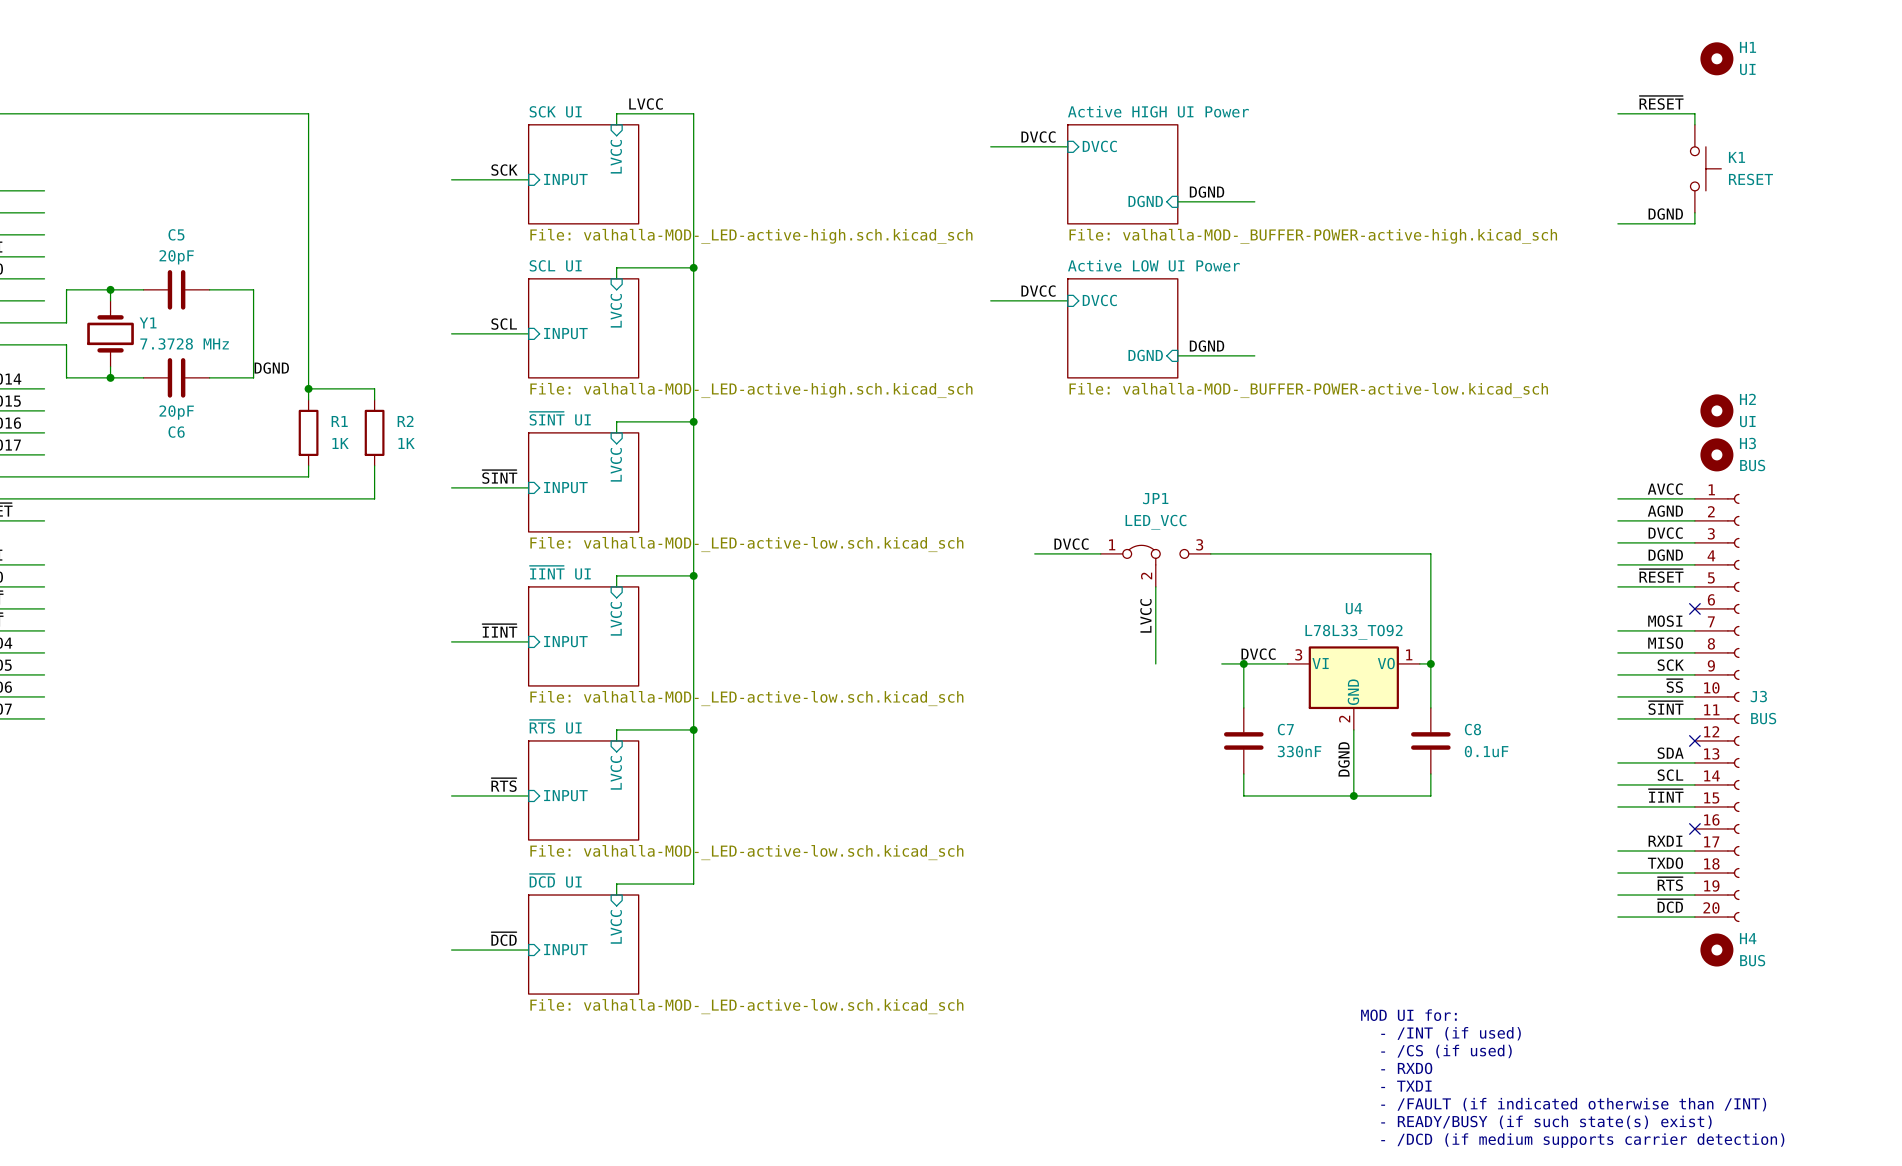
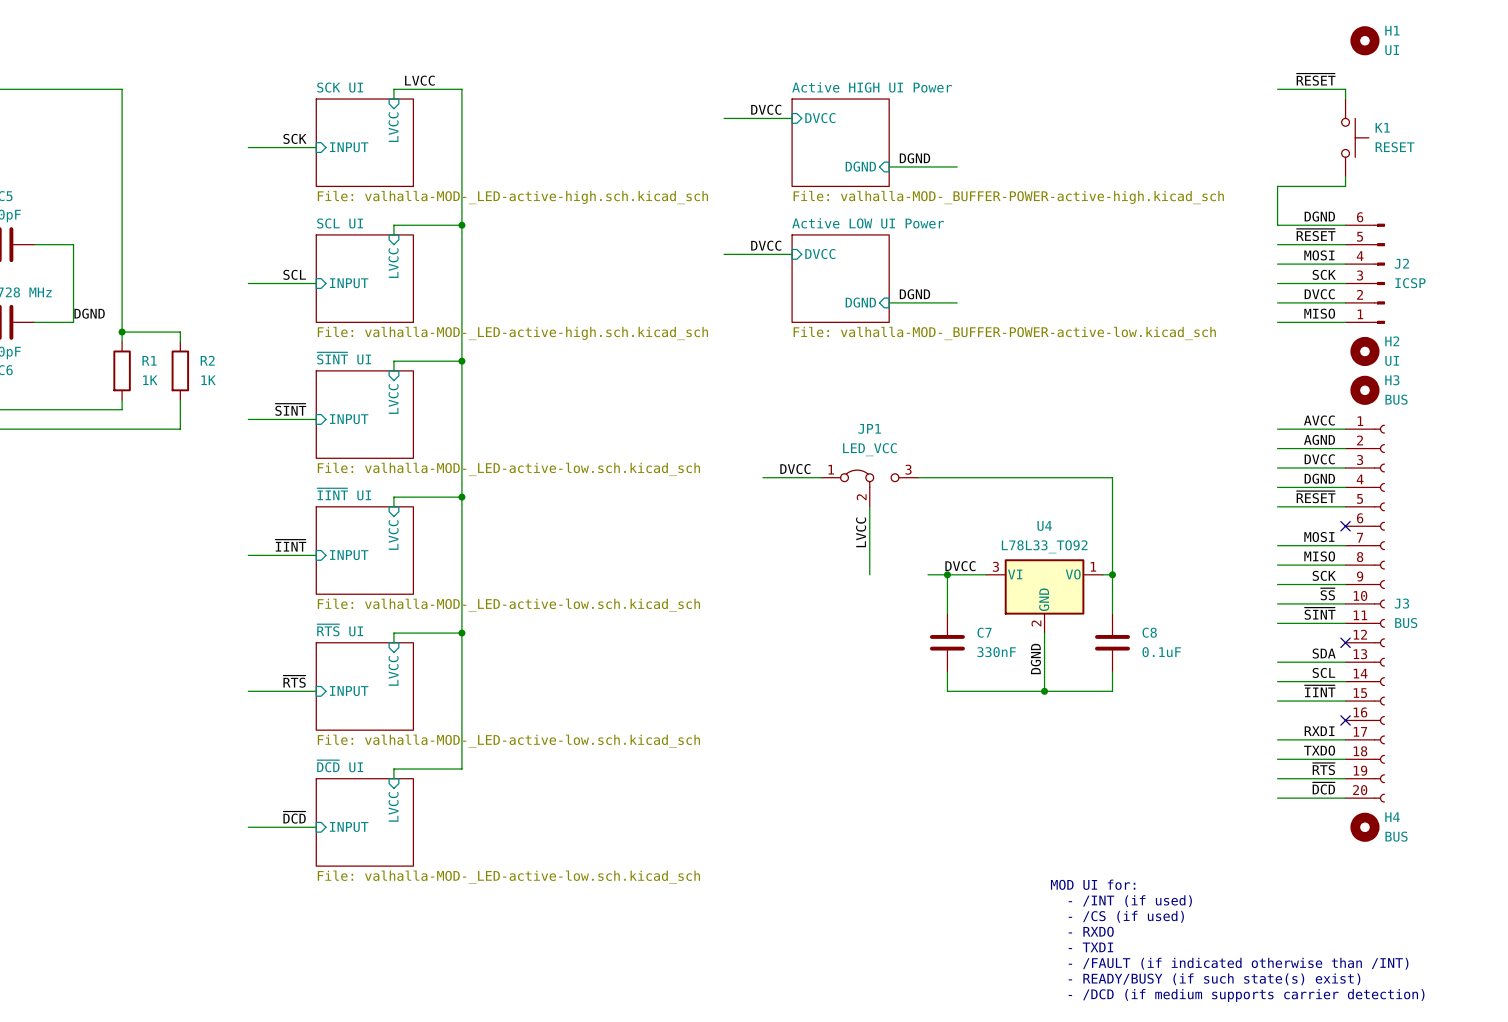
label position: DGND (1665, 214) -> DGND (1319, 216)
wire: none -> (1277, 186) (1277, 225) (1345, 225)
label: none -> ~{RESET} (1316, 234)
wire: none -> (1277, 244) (1345, 244)
label: none -> MOSI (1319, 255)
wire: none -> (1277, 264) (1345, 264)
J2: none -> ICSP (1365, 273)
label: none -> SCK (1324, 274)
wire: none -> (1277, 283) (1345, 283)
label: none -> DVCC (1319, 294)
wire: none -> (1277, 302) (1345, 302)
label: none -> MISO (1319, 313)
wire: none -> (1277, 322) (1345, 322)

